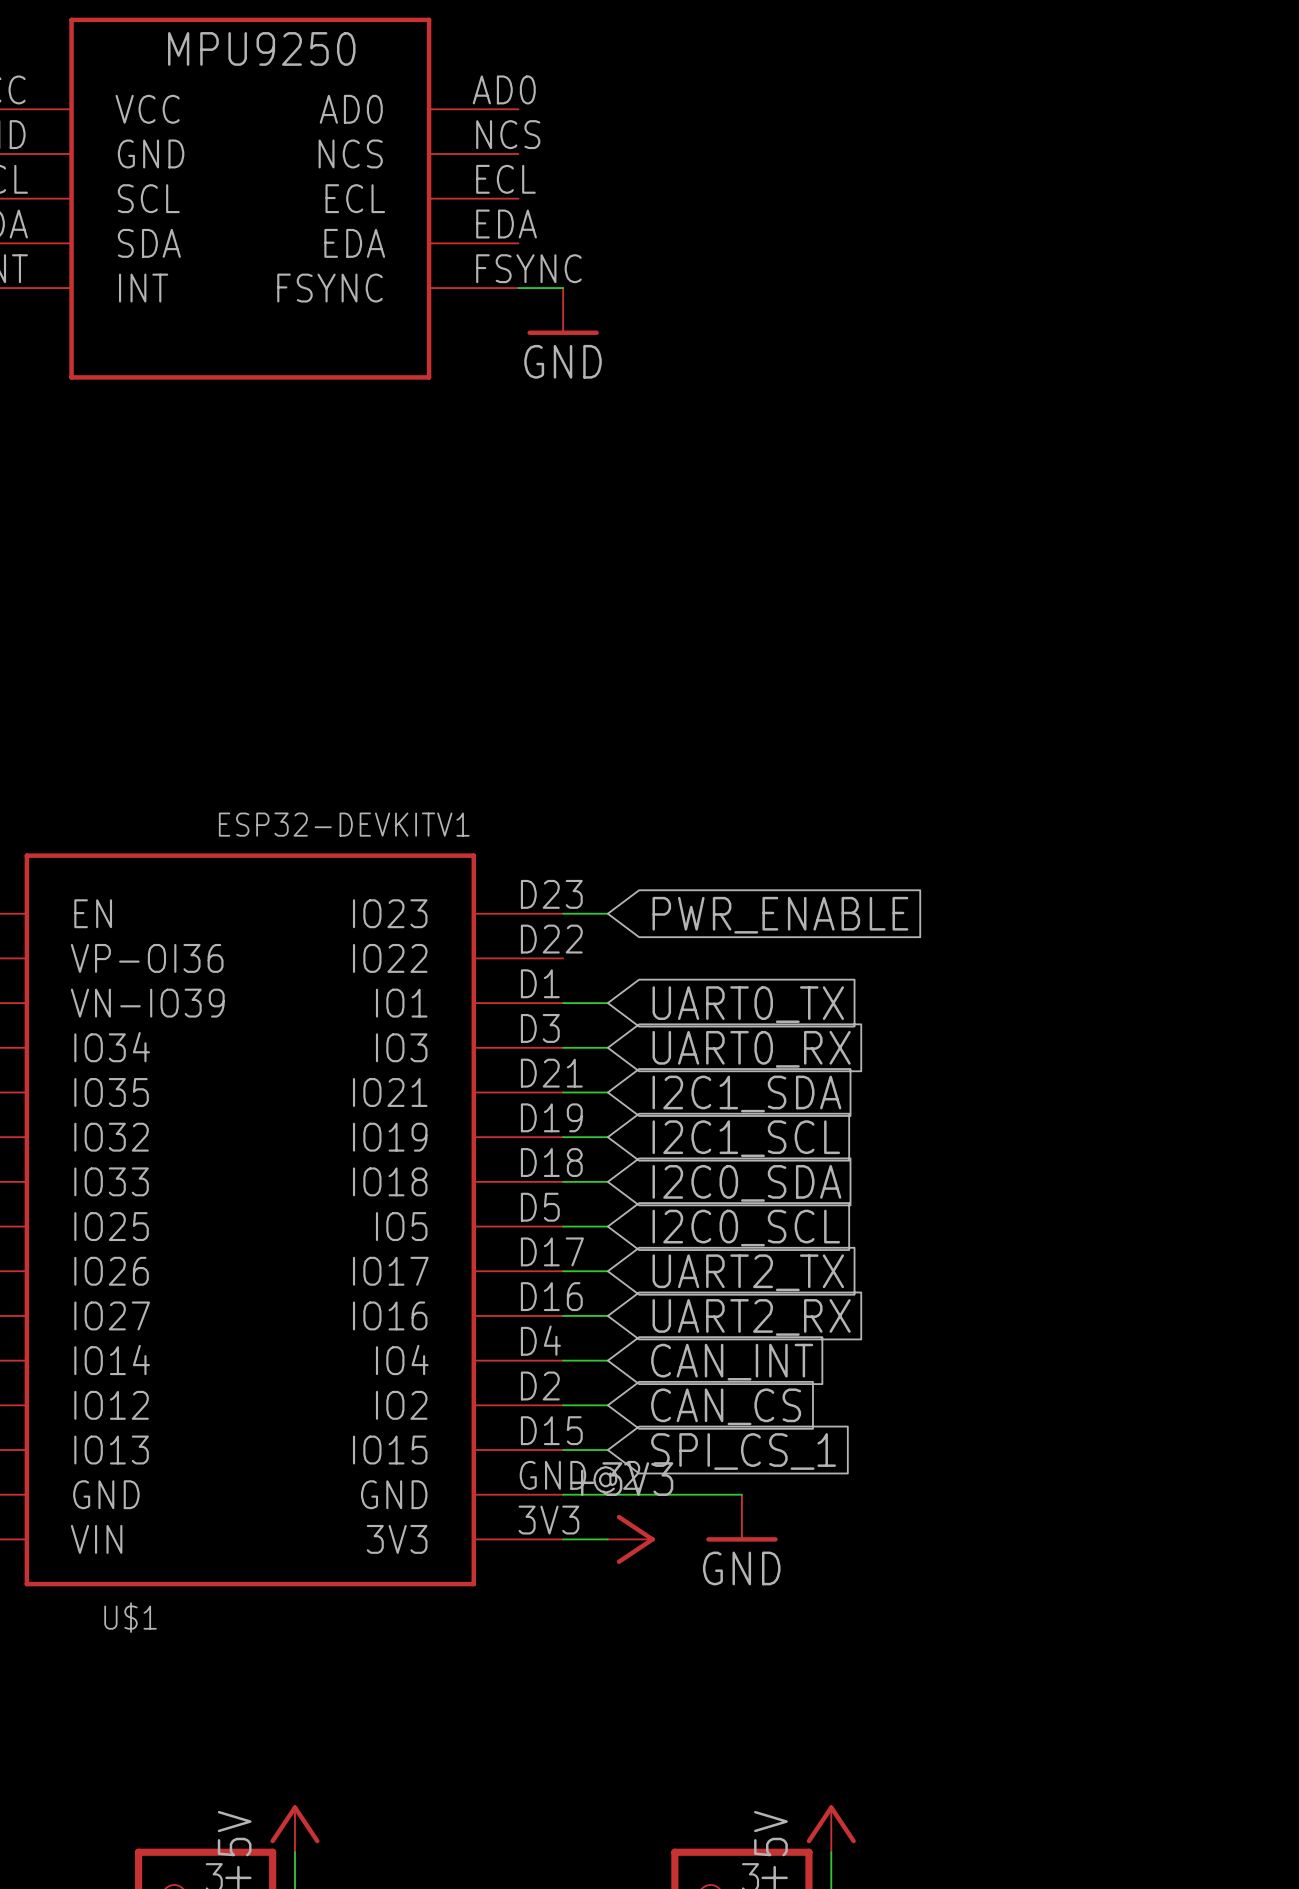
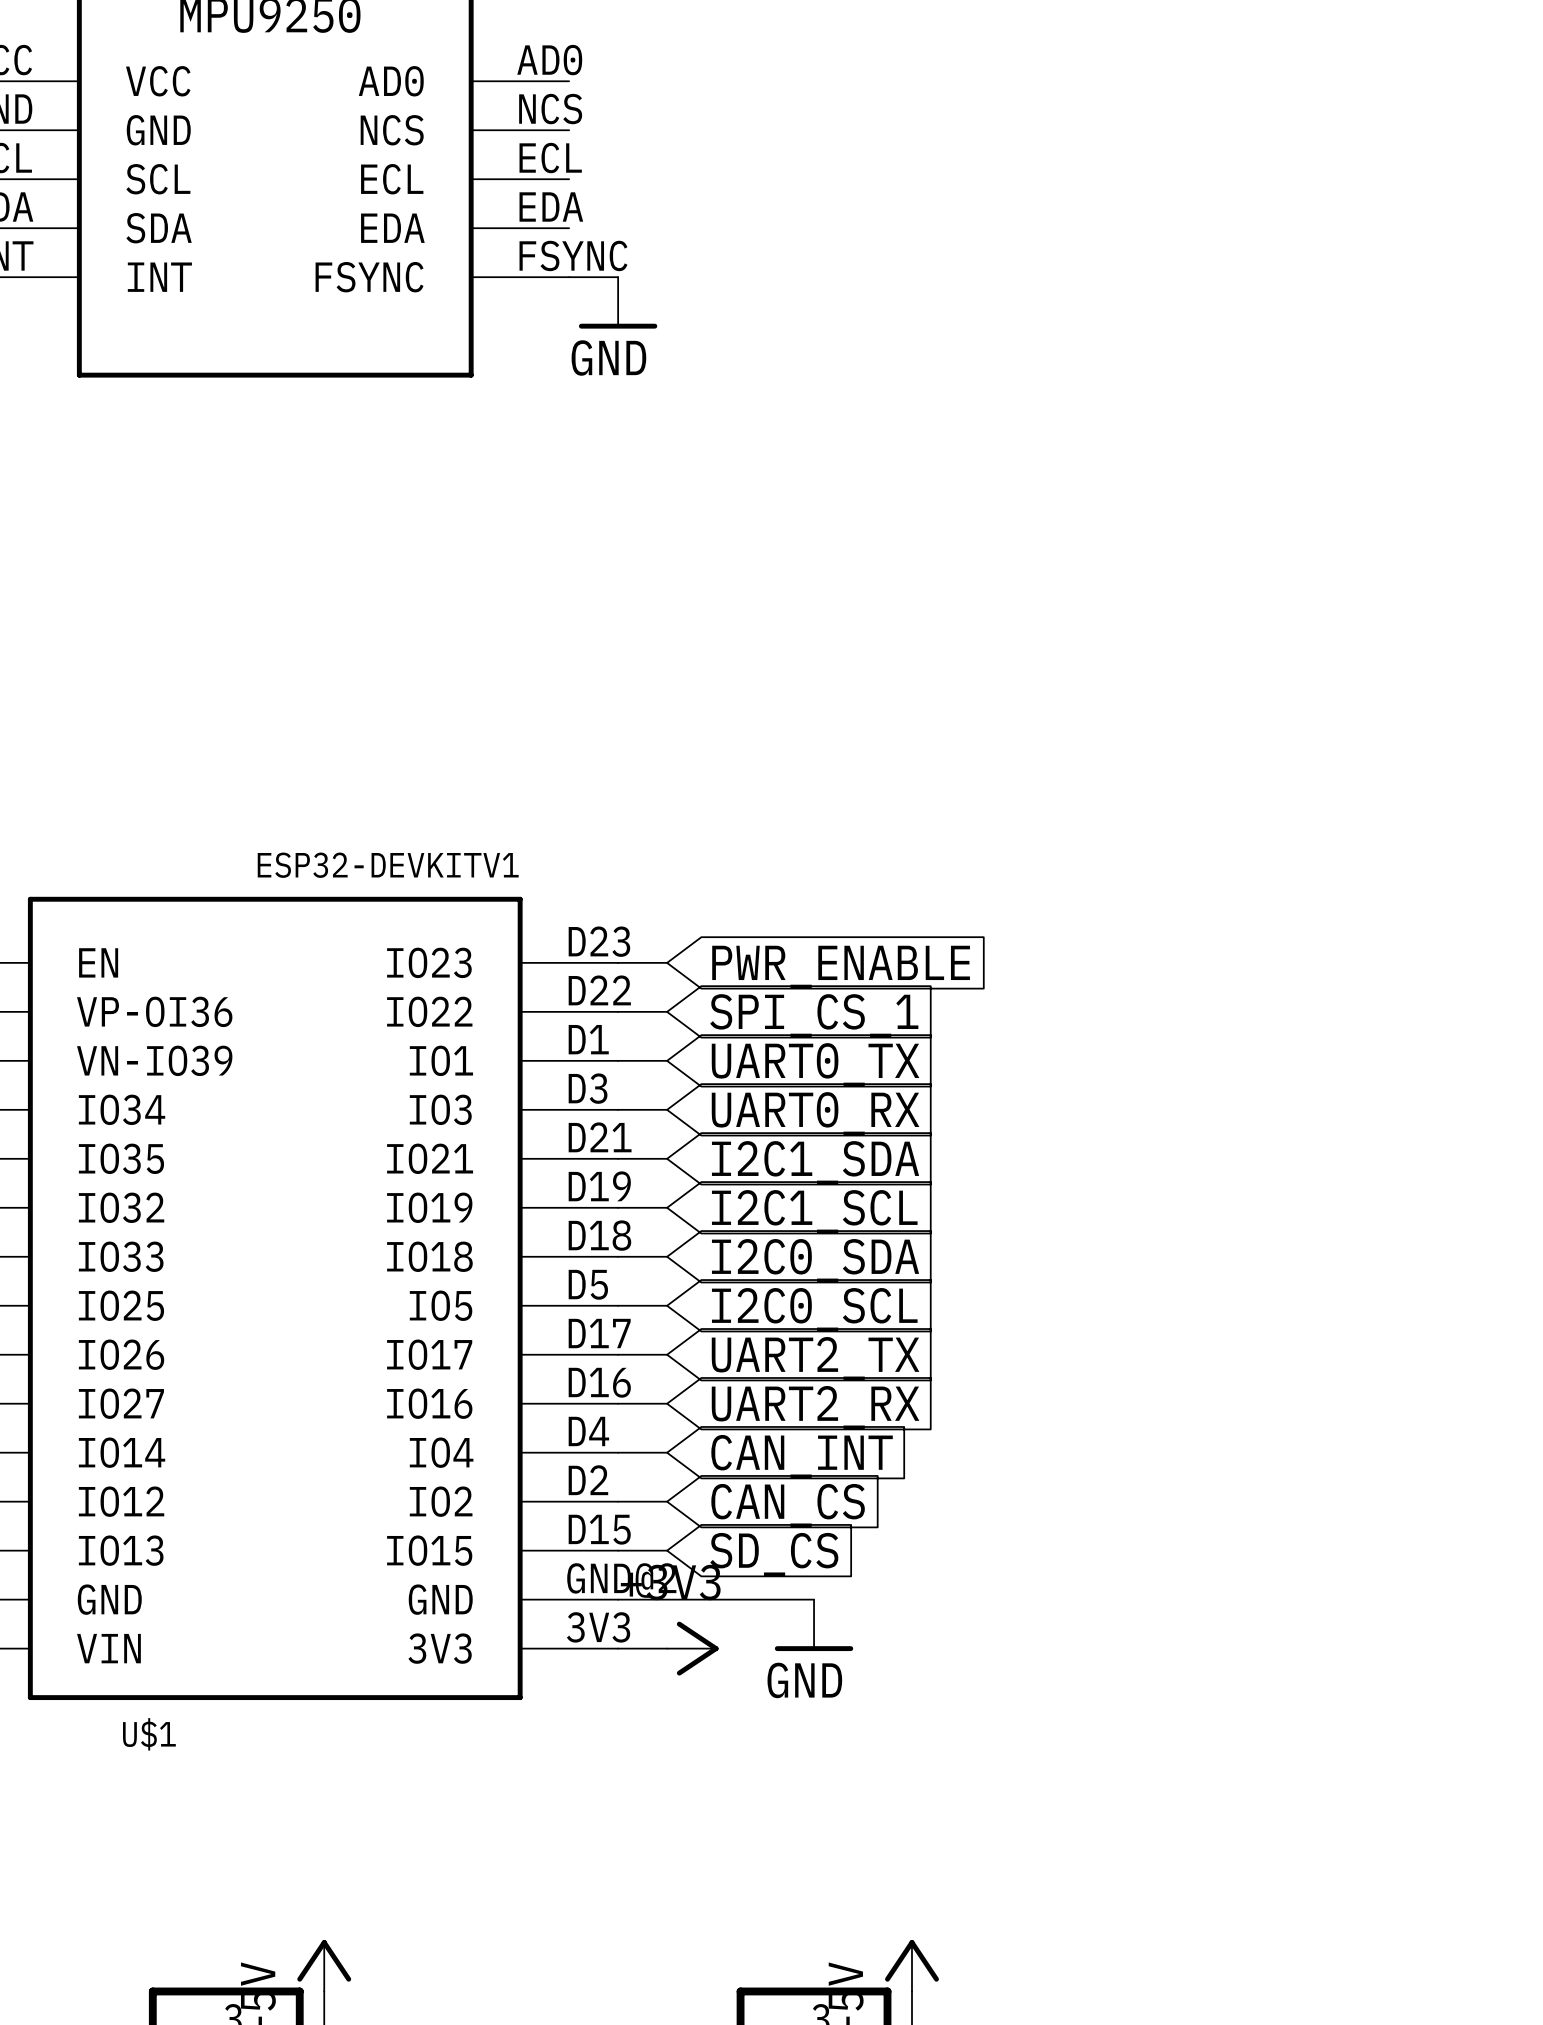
wire: none -> (618, 1011) (667, 1011)
global label: none -> SPI_CS_1 (814, 1015)
global label: SPI_CS_1 (743, 1451) -> SD_CS (774, 1554)

